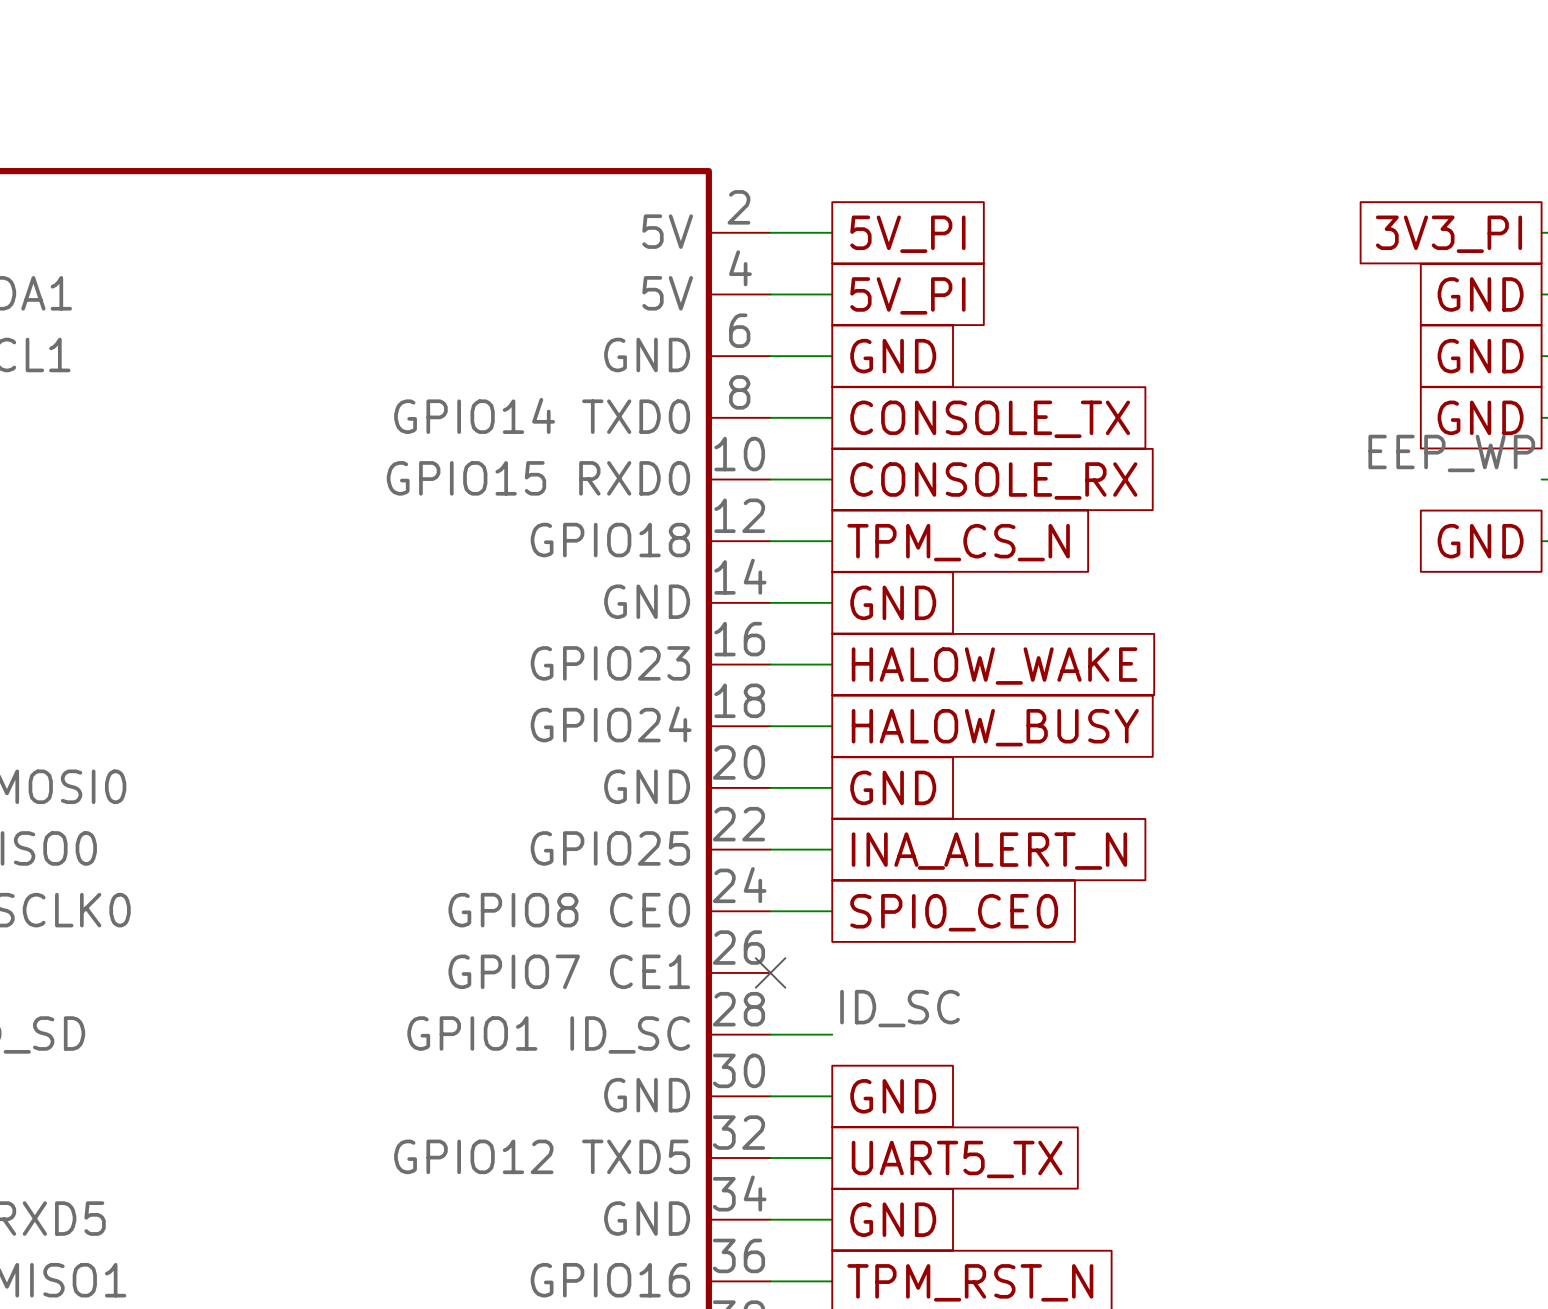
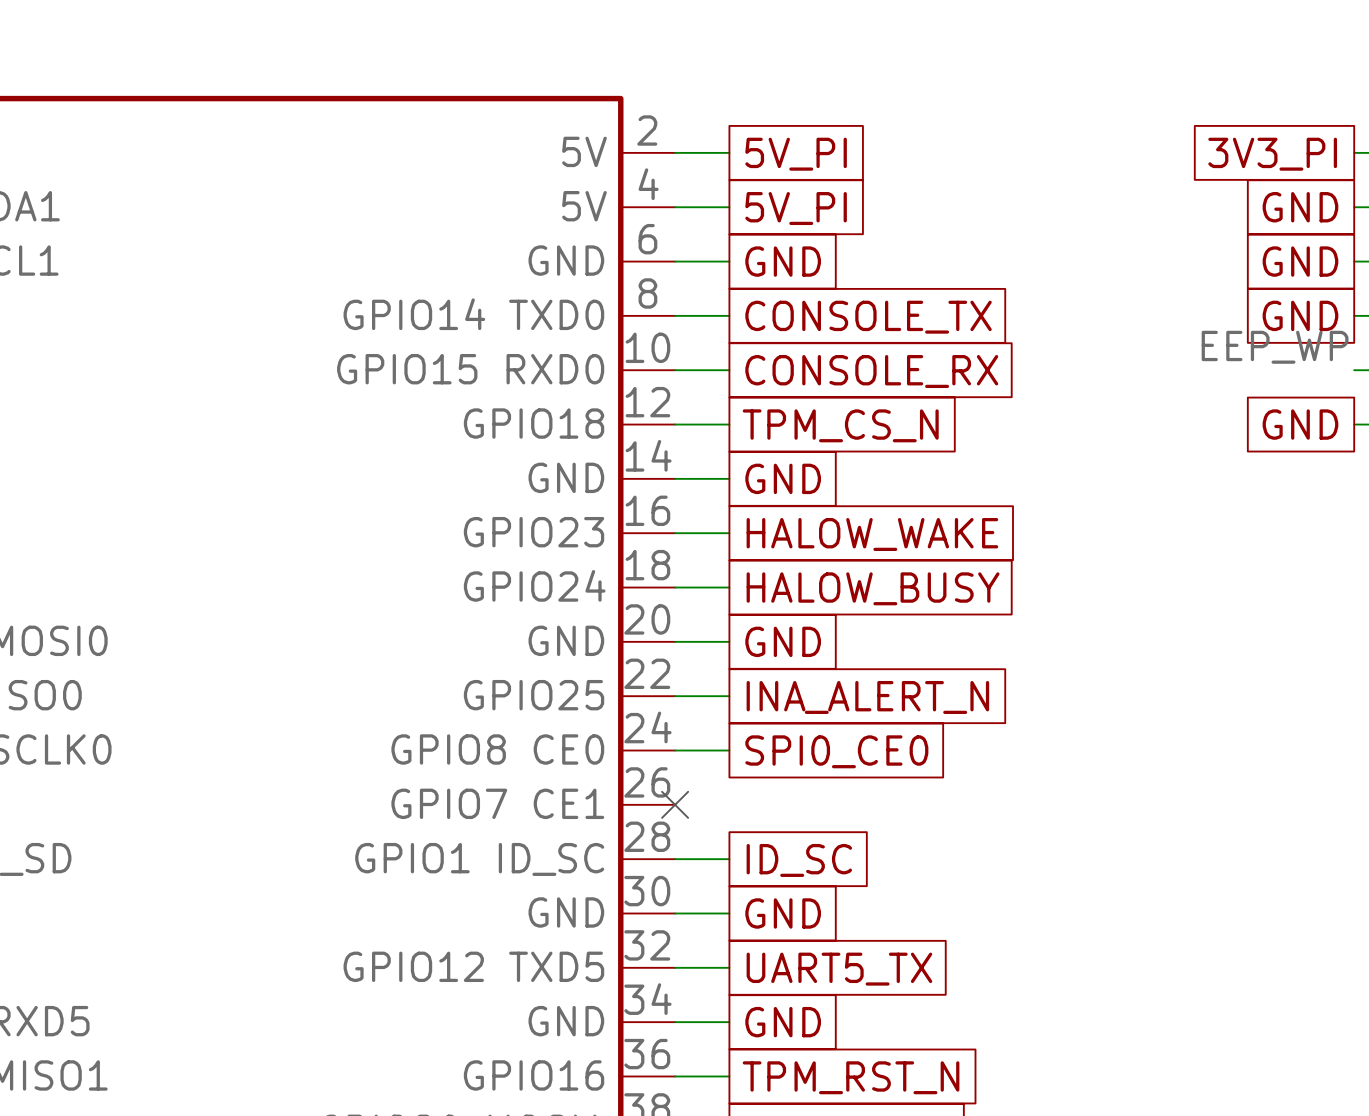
label: ID_SC (900, 1008) -> none
global label: none -> ID_SC (799, 860)

